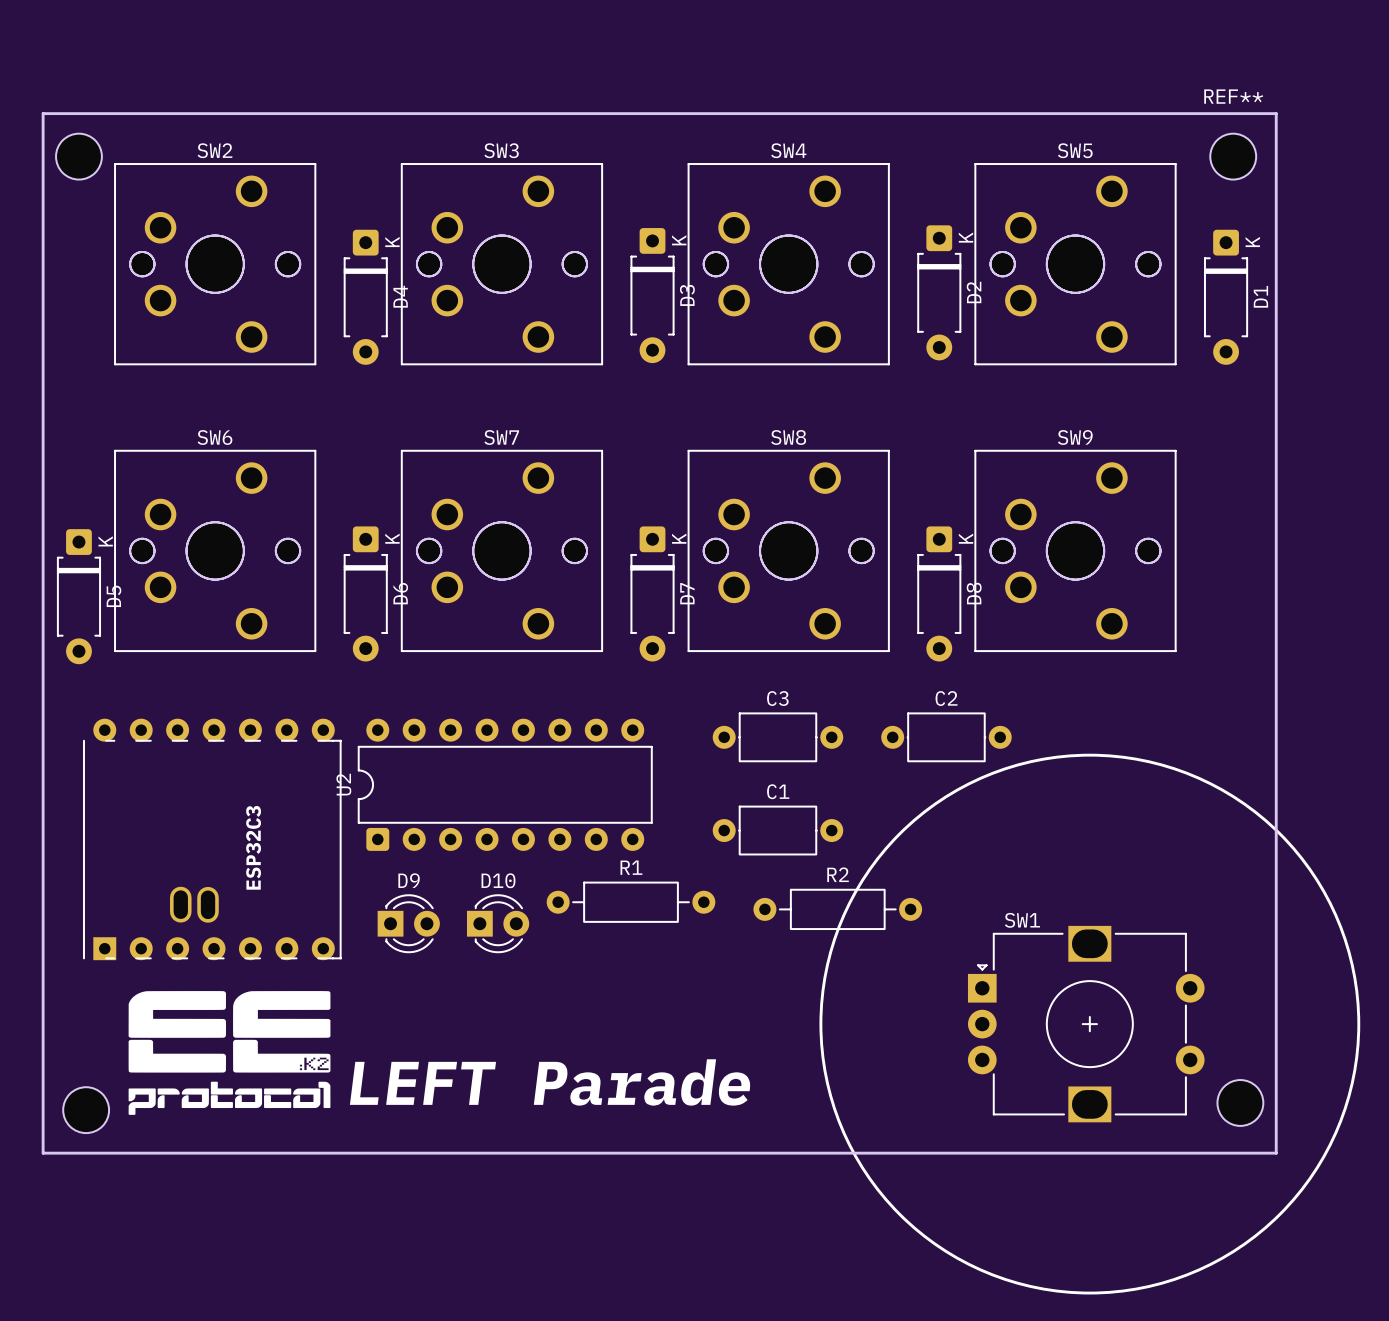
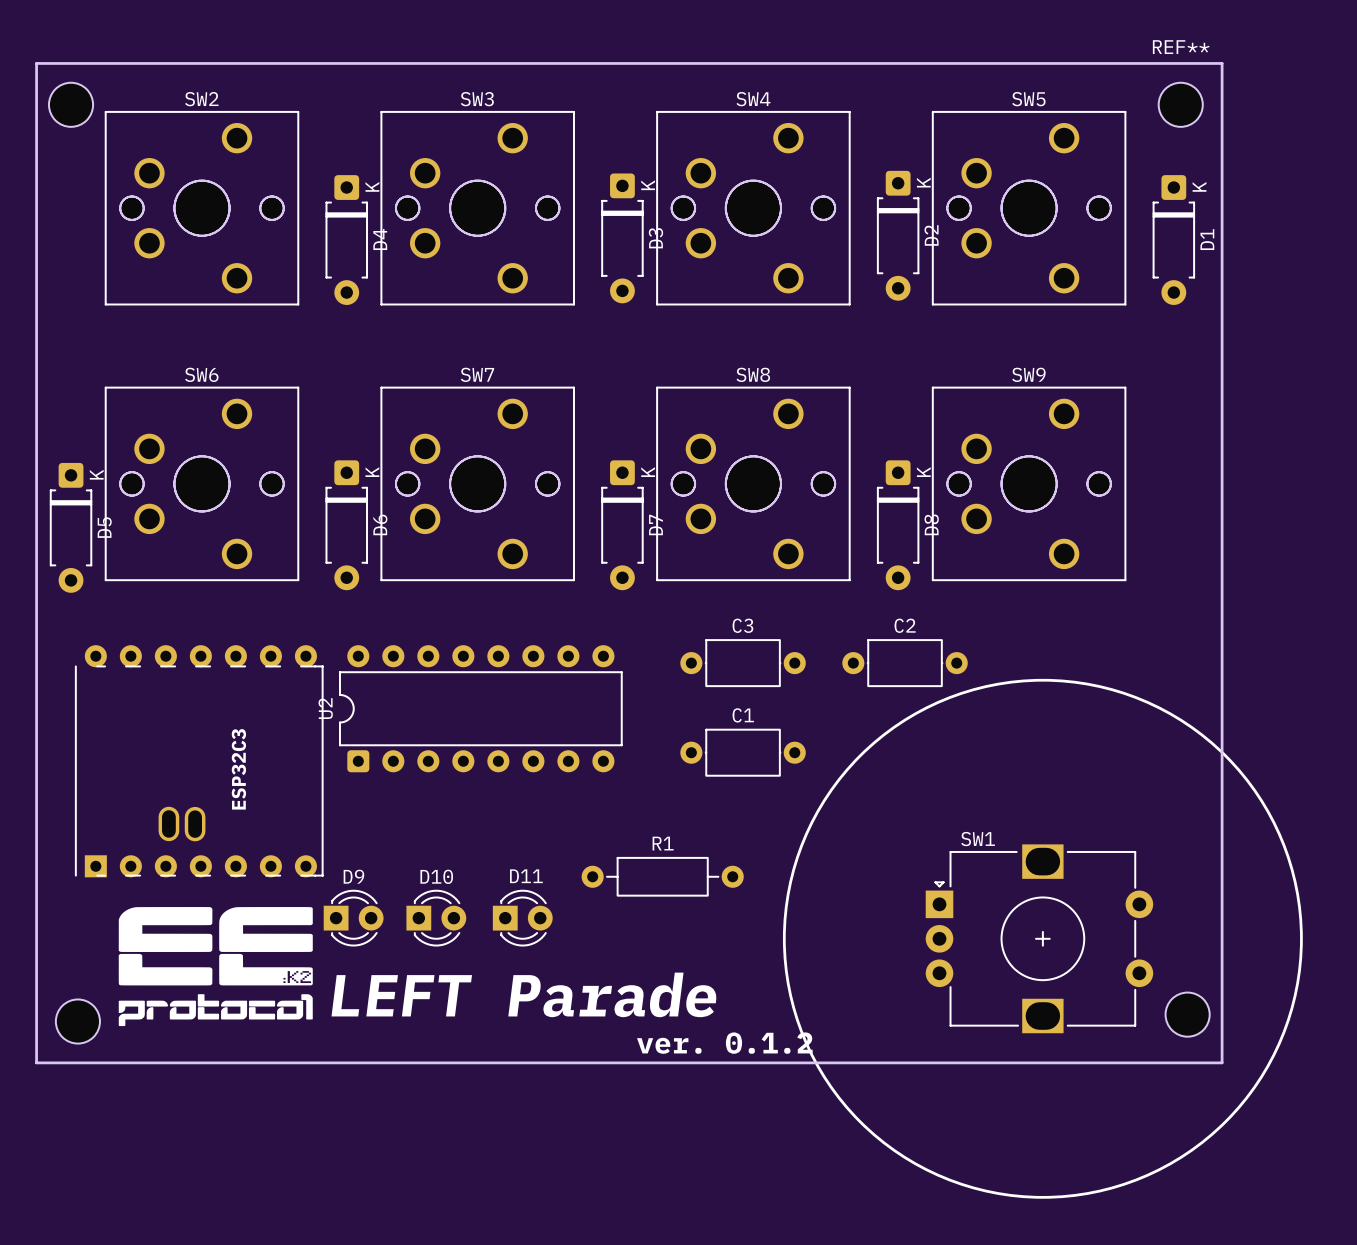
R1 position: (631, 902) -> (662, 876)
R2: (837, 909) -> none
D9 position: (408, 923) -> (353, 918)
D10 position: (498, 923) -> (436, 918)
D11: none -> (522, 918)
text: none -> ver. 0.1.2 (724, 1043)

